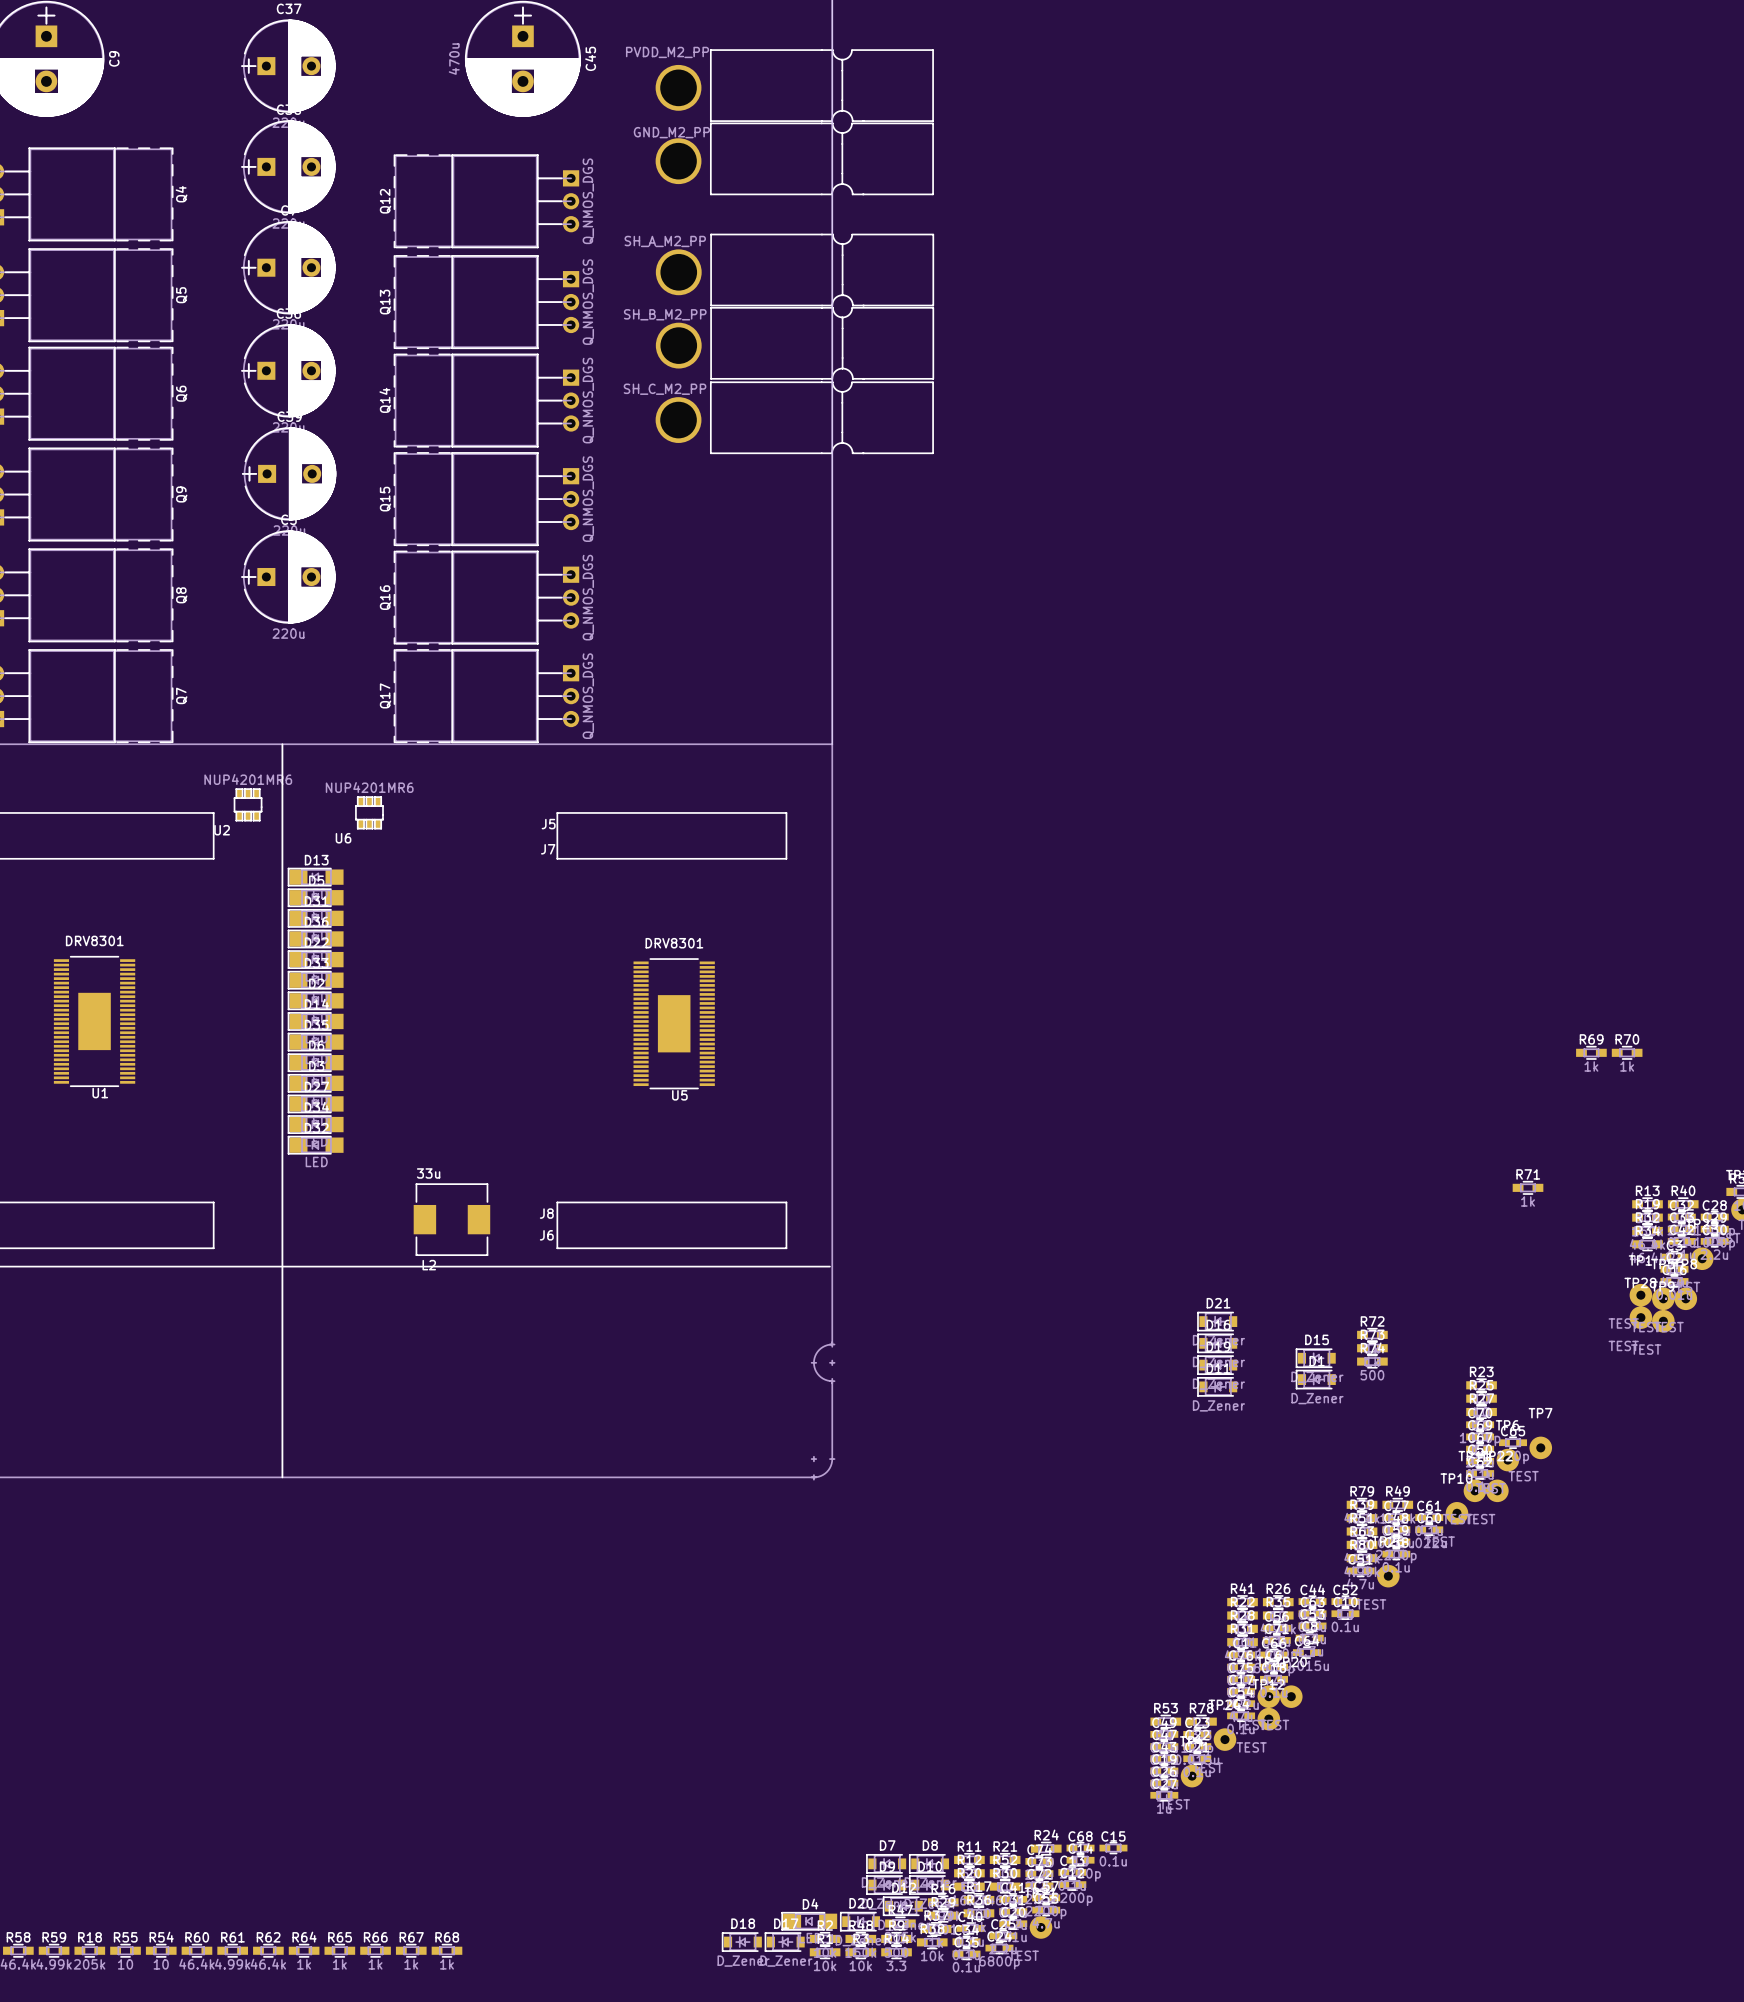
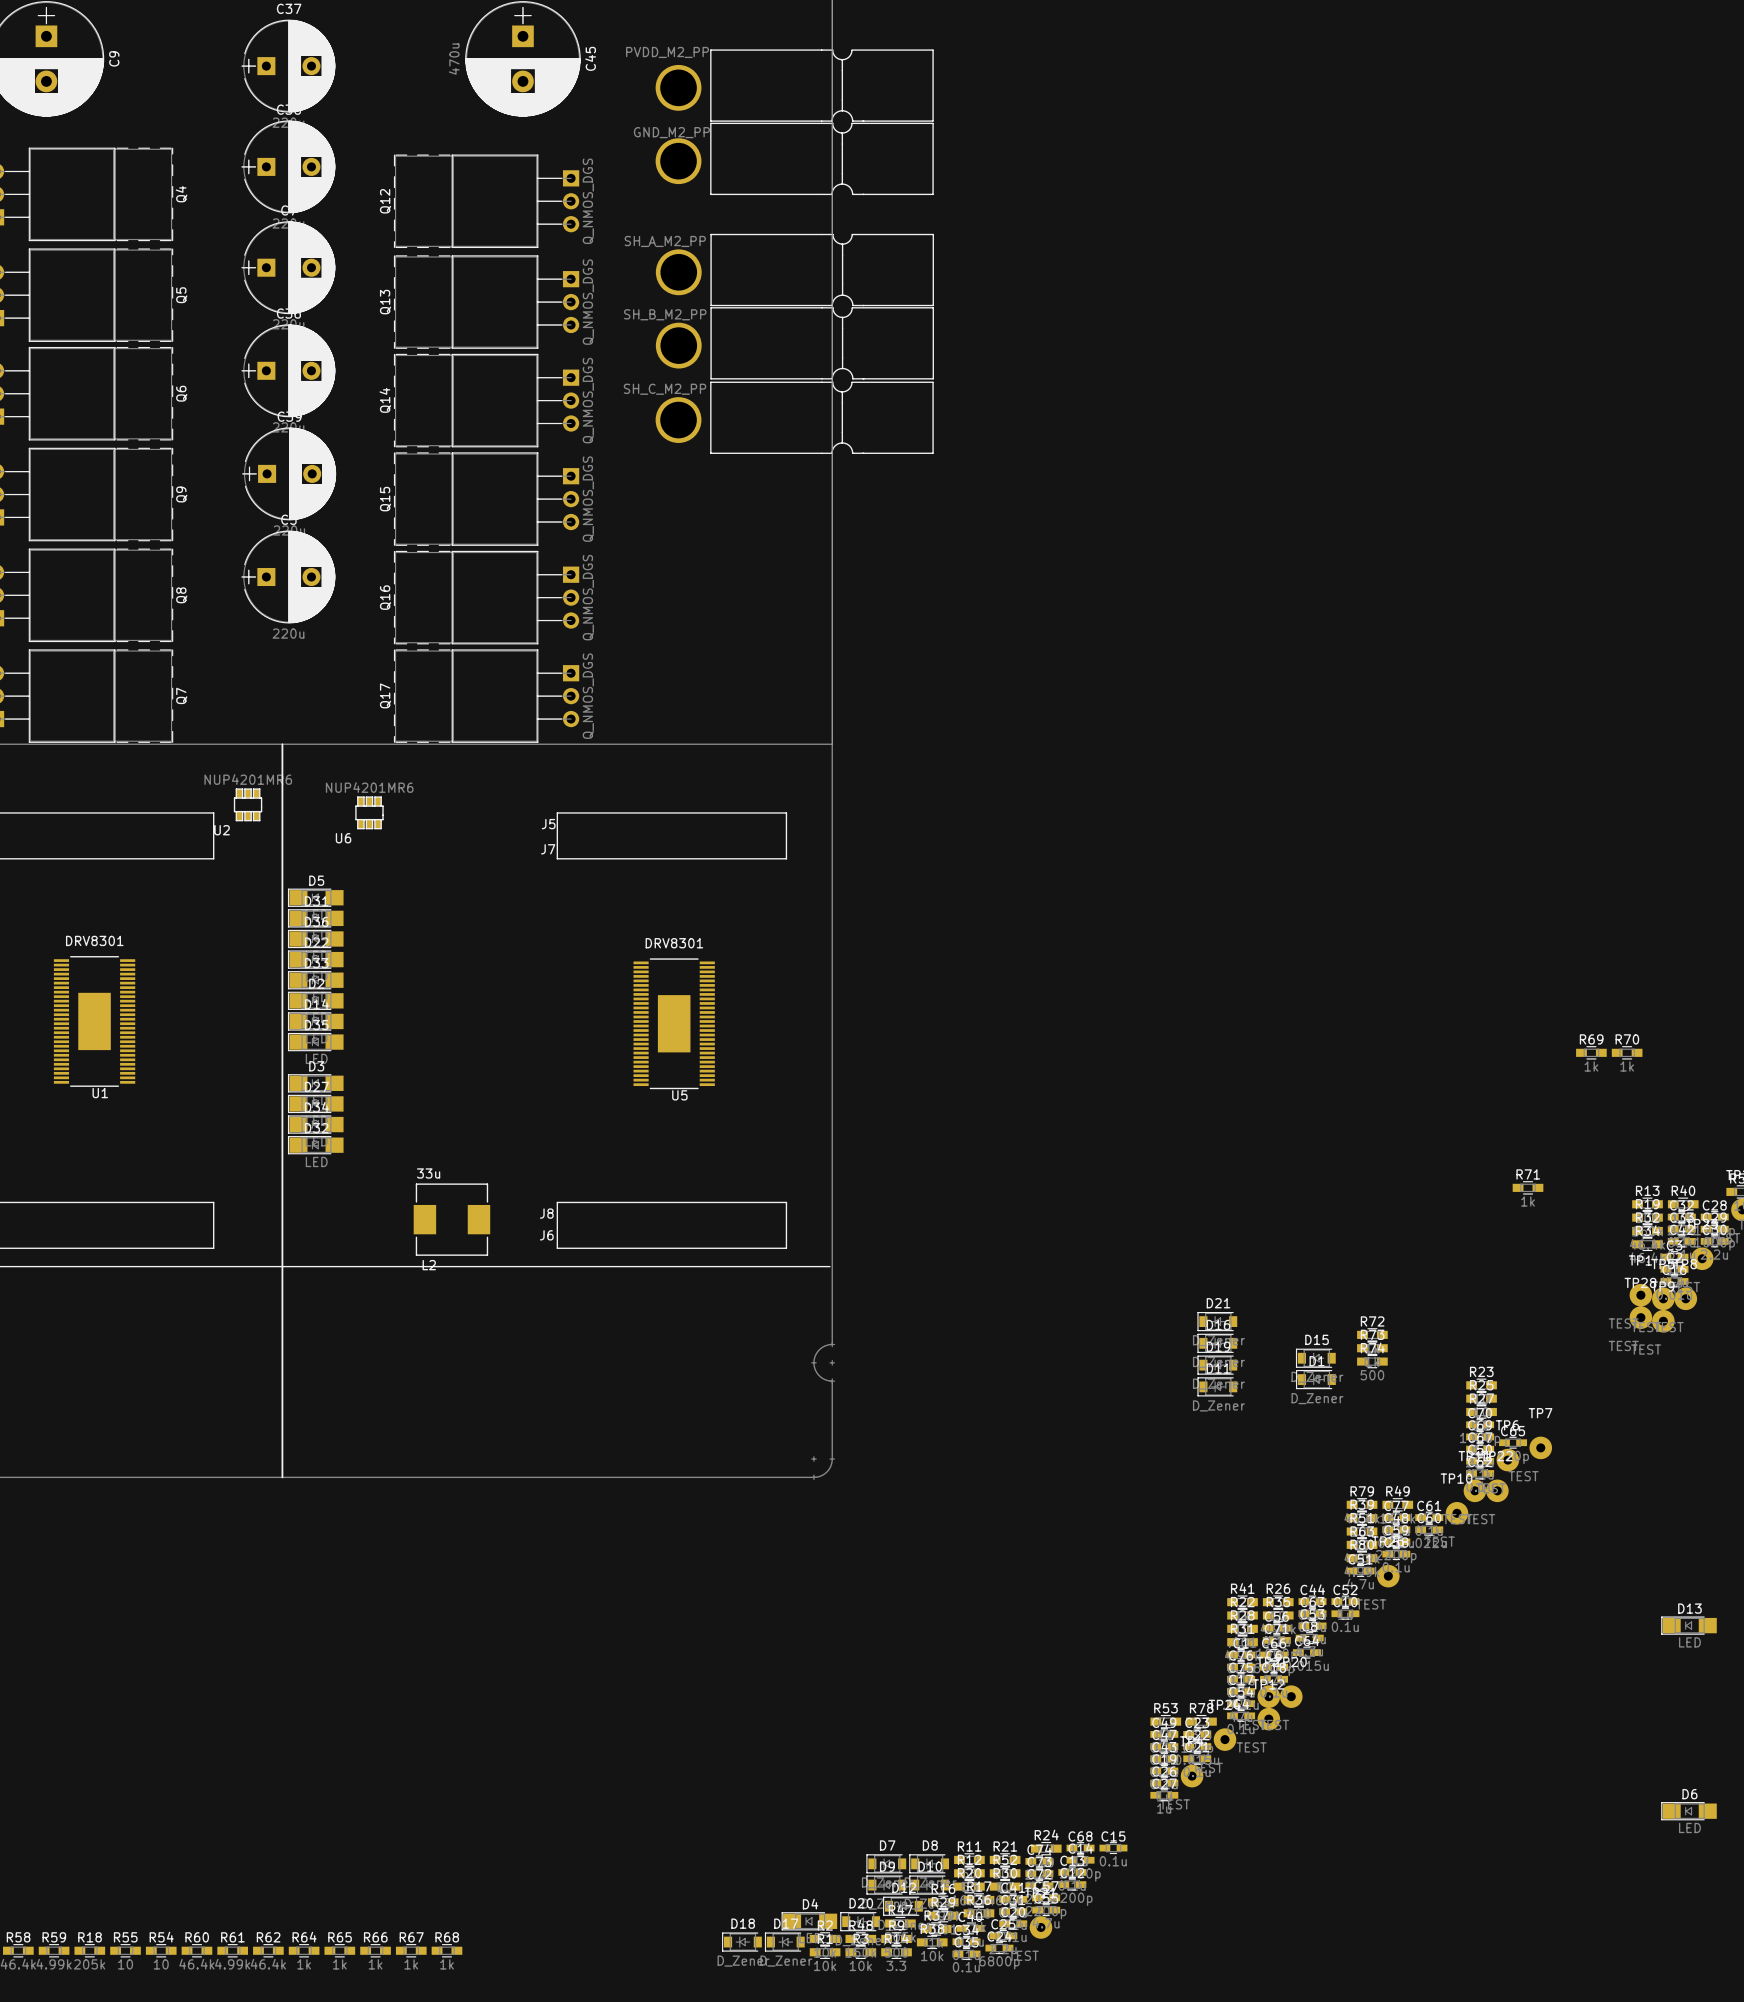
D13 position: (315, 877) -> (1689, 1625)
D6 position: (315, 1062) -> (1689, 1811)

